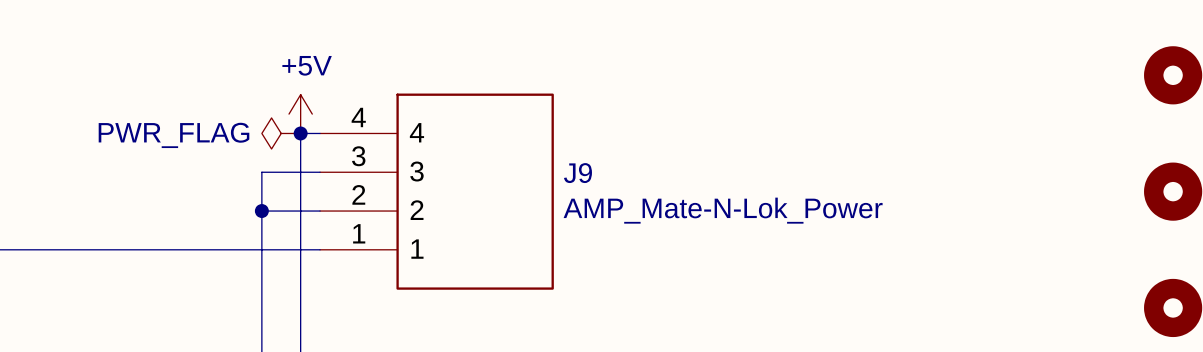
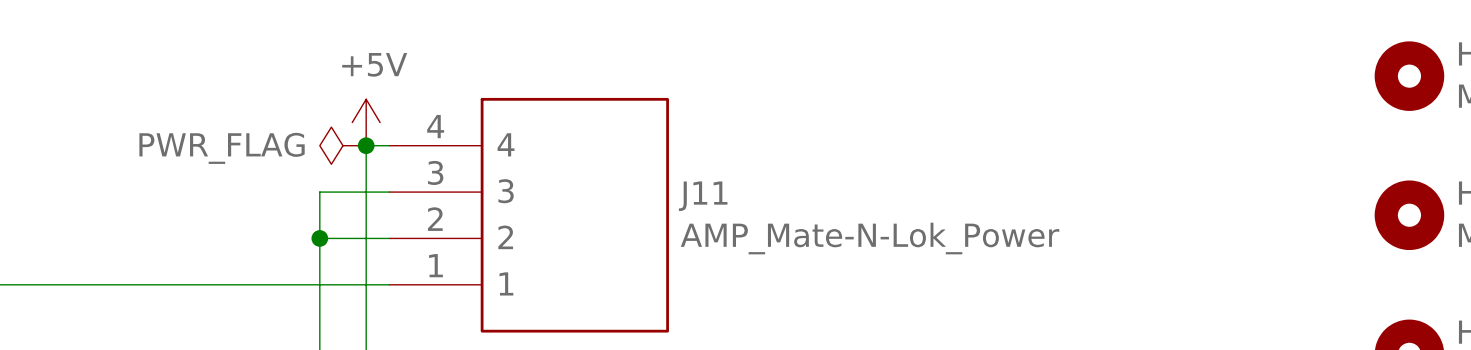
J9 name: J9 (577, 173) -> J11 (703, 196)

